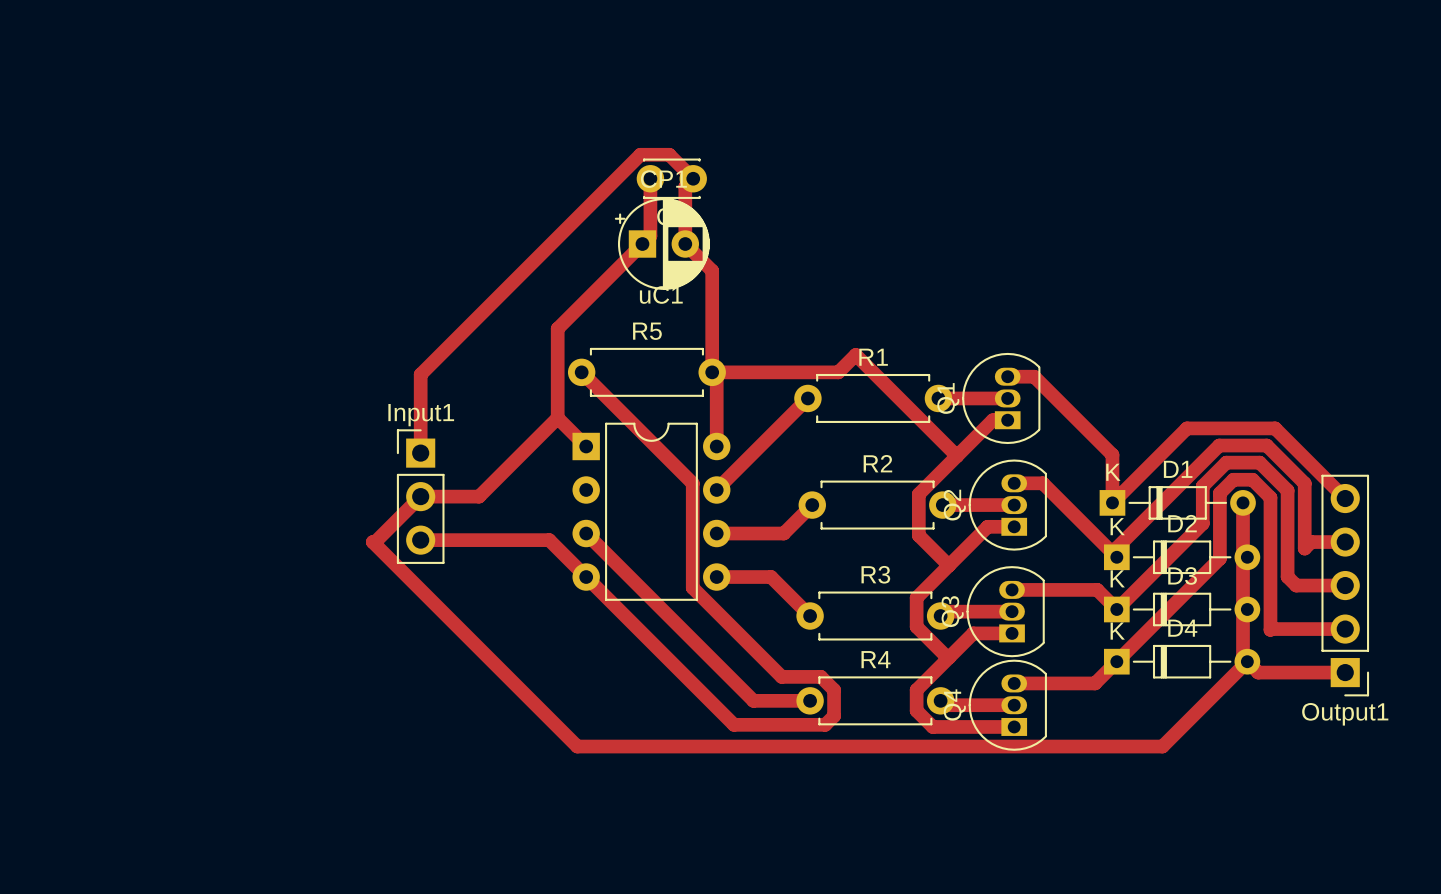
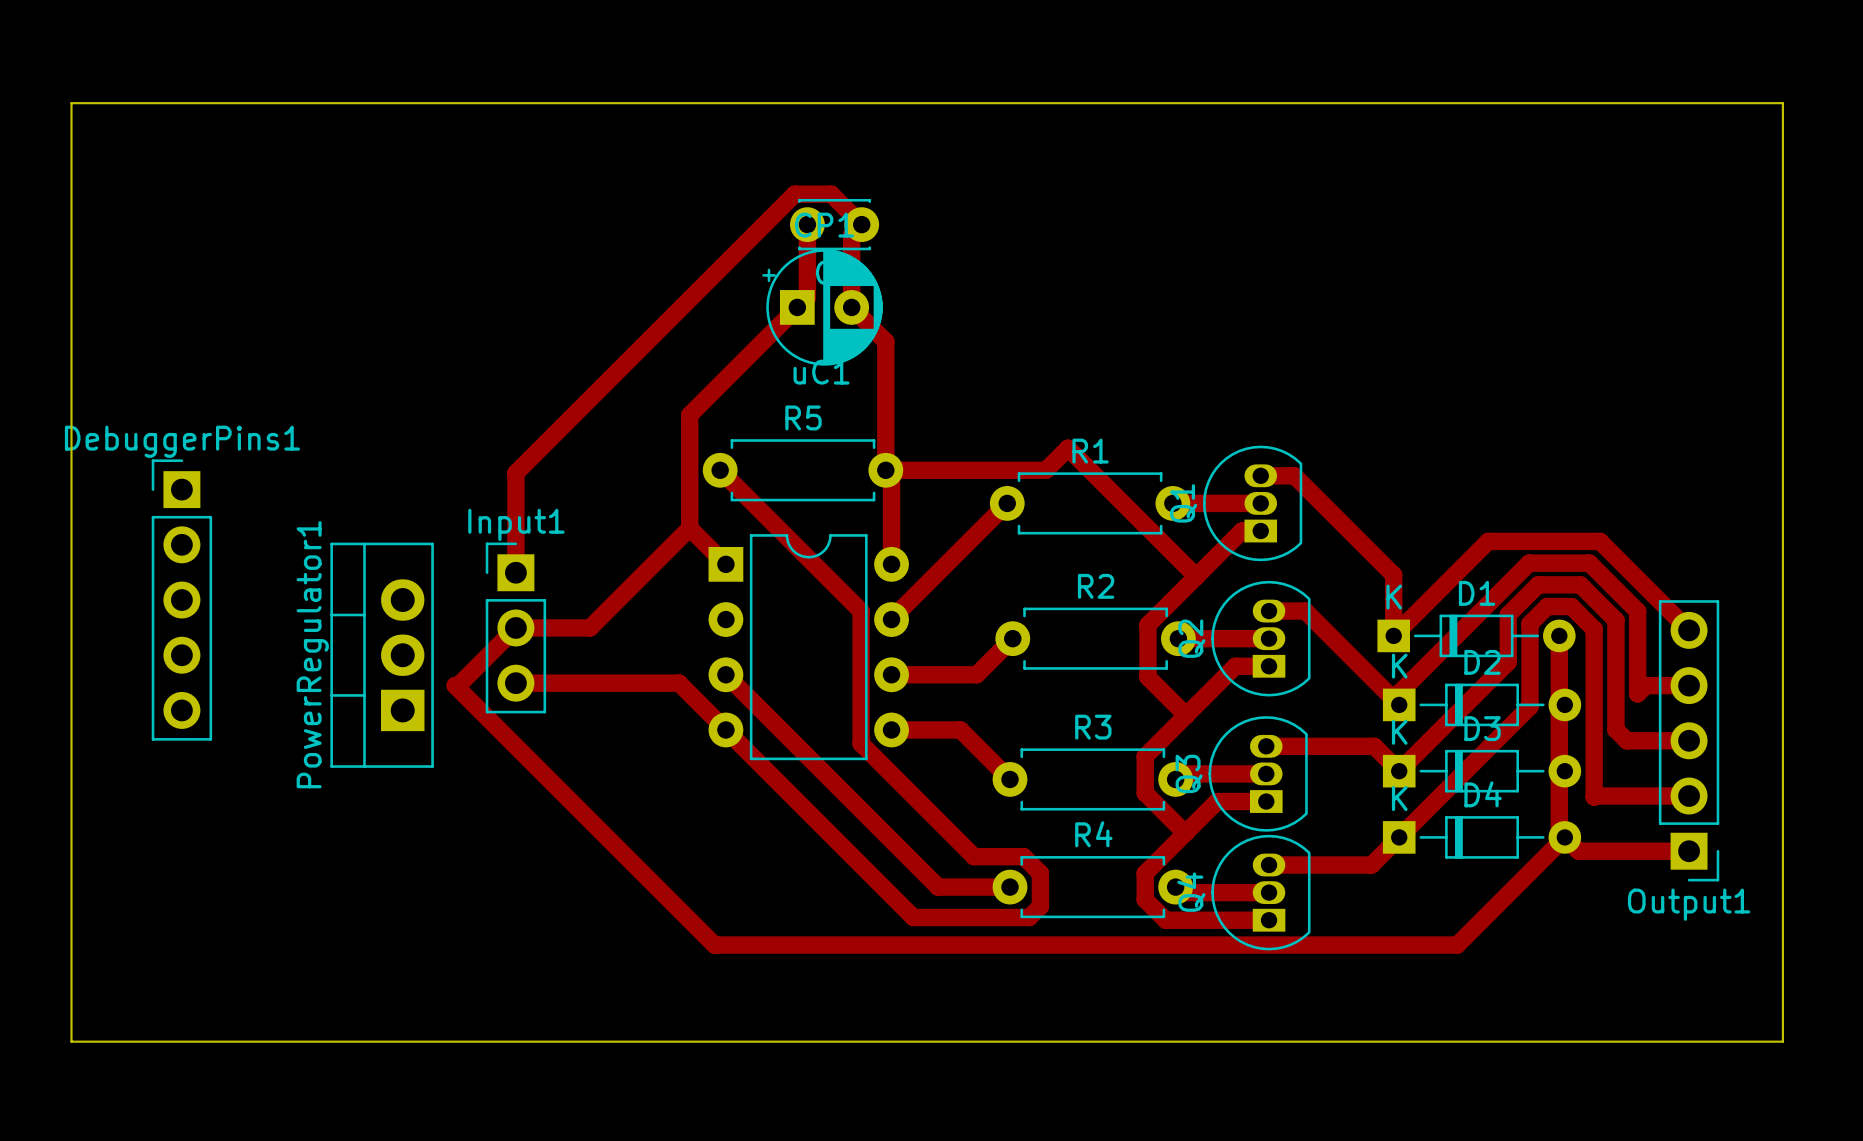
board edge: none -> (71, 103) (1782, 103) (1782, 1041) (71, 1041) (71, 103)
DebuggerPins1: none -> (181, 600)
PowerRegulator1: none -> (382, 655)

